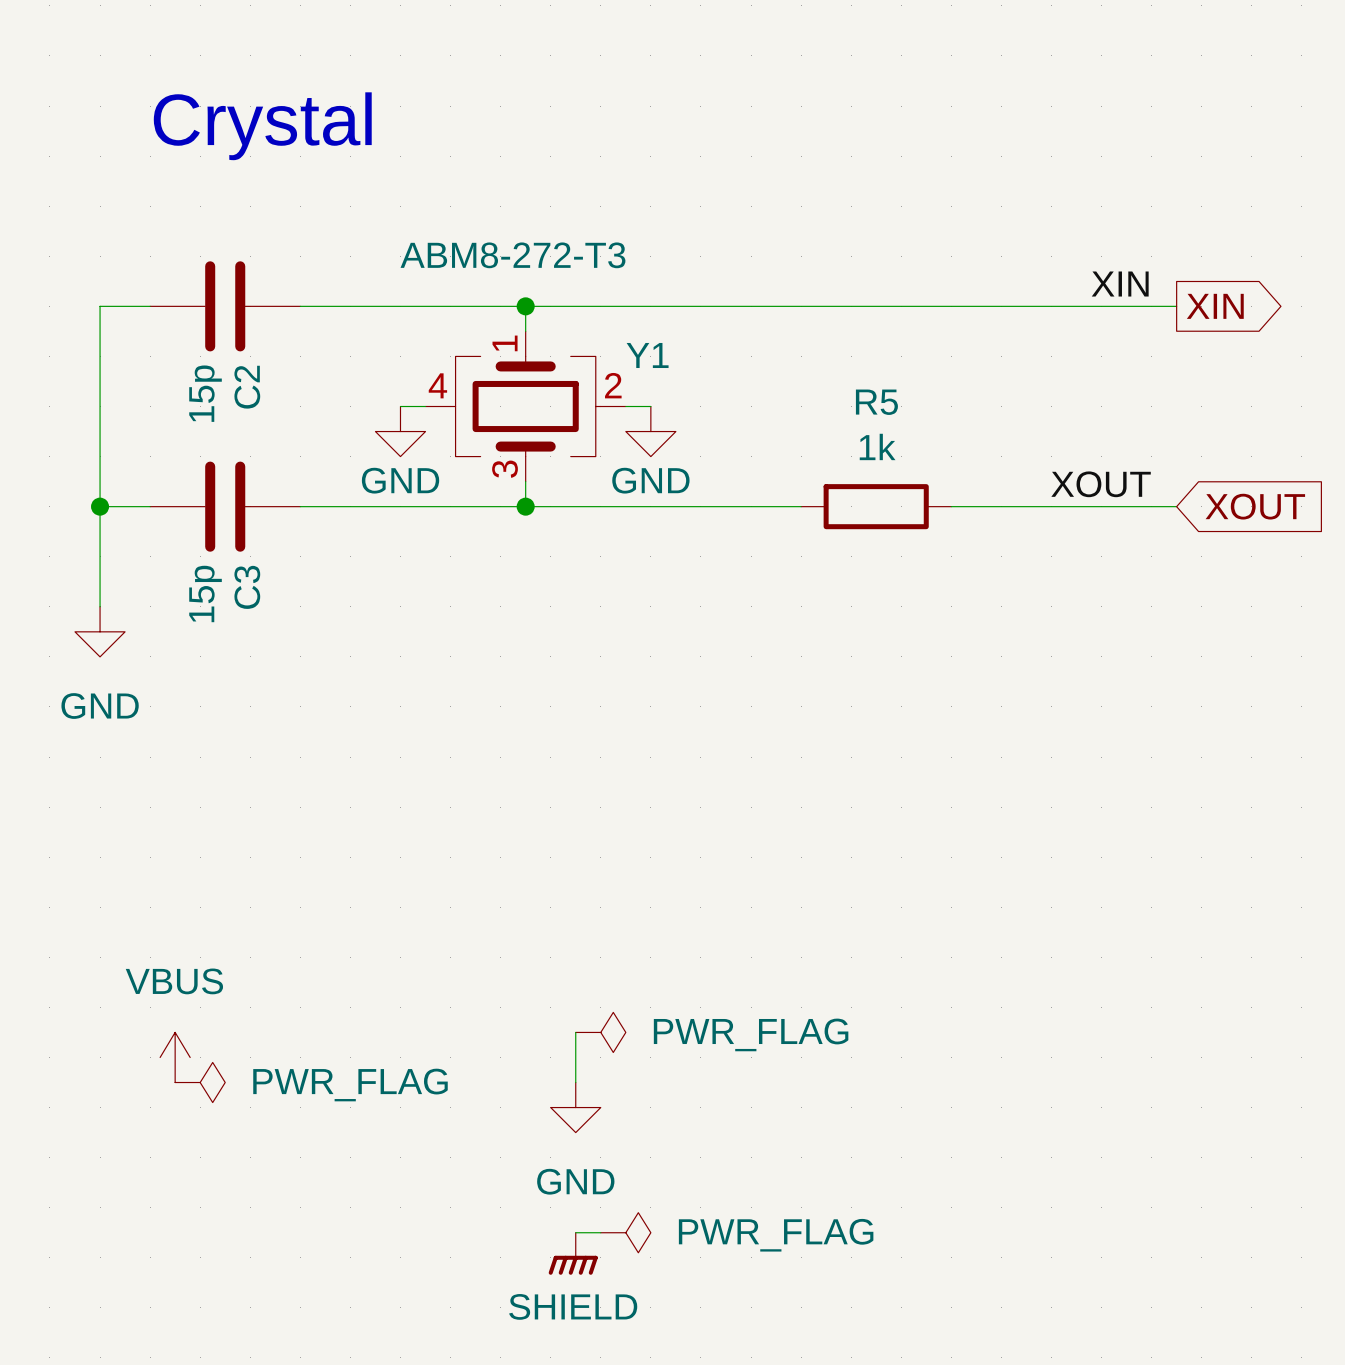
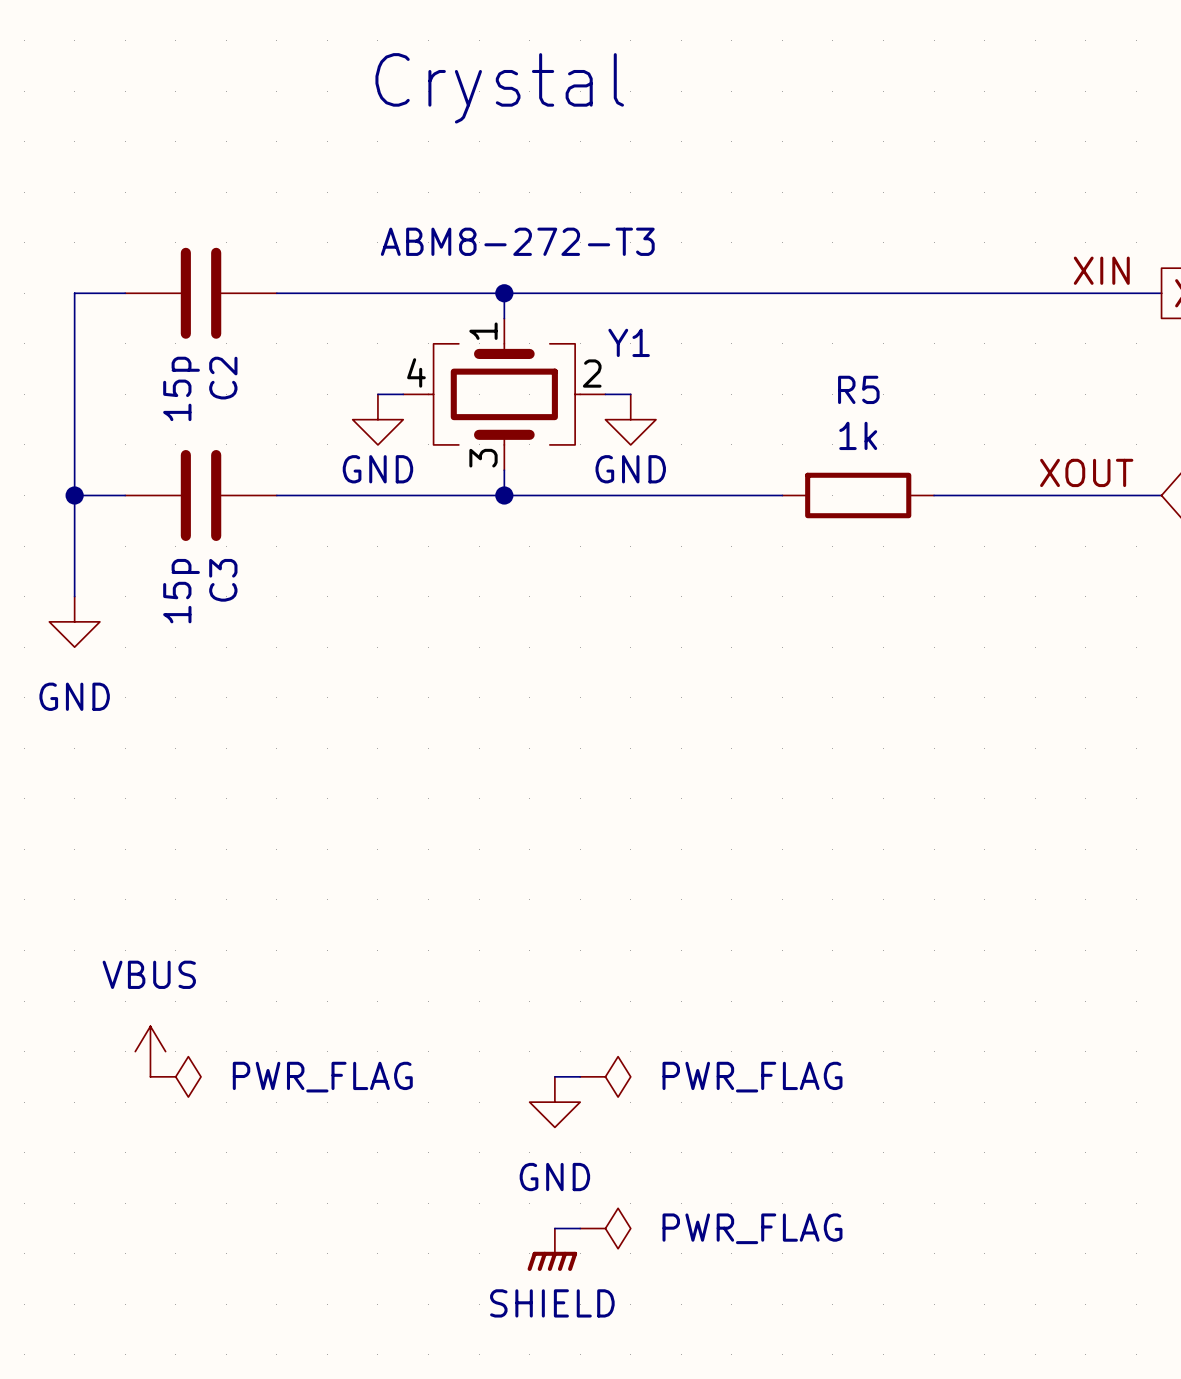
text position: Crystal (262, 126) -> Crystal (499, 88)
wire: (575, 1032) (575, 1082) -> (580, 1076) (554, 1076)
power symbol position: PWR_FLAG (600, 1032) -> PWR_FLAG (605, 1076)

